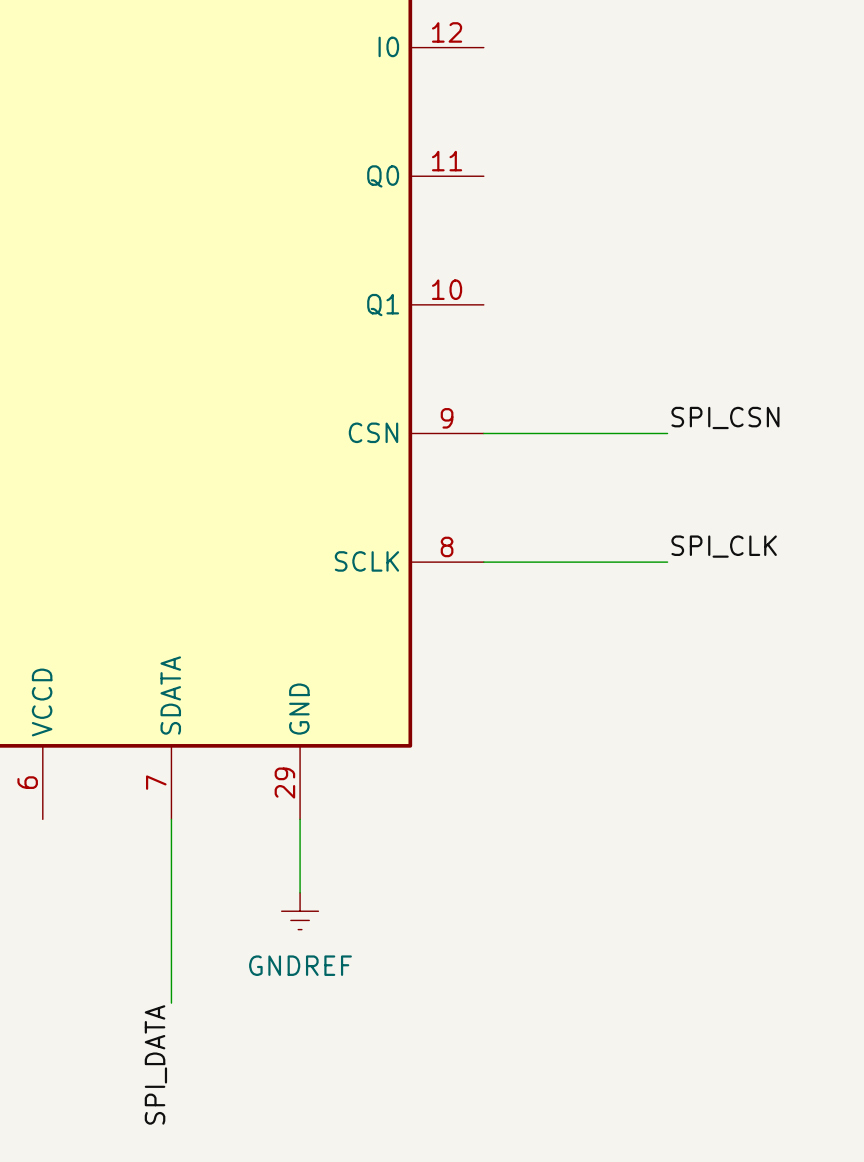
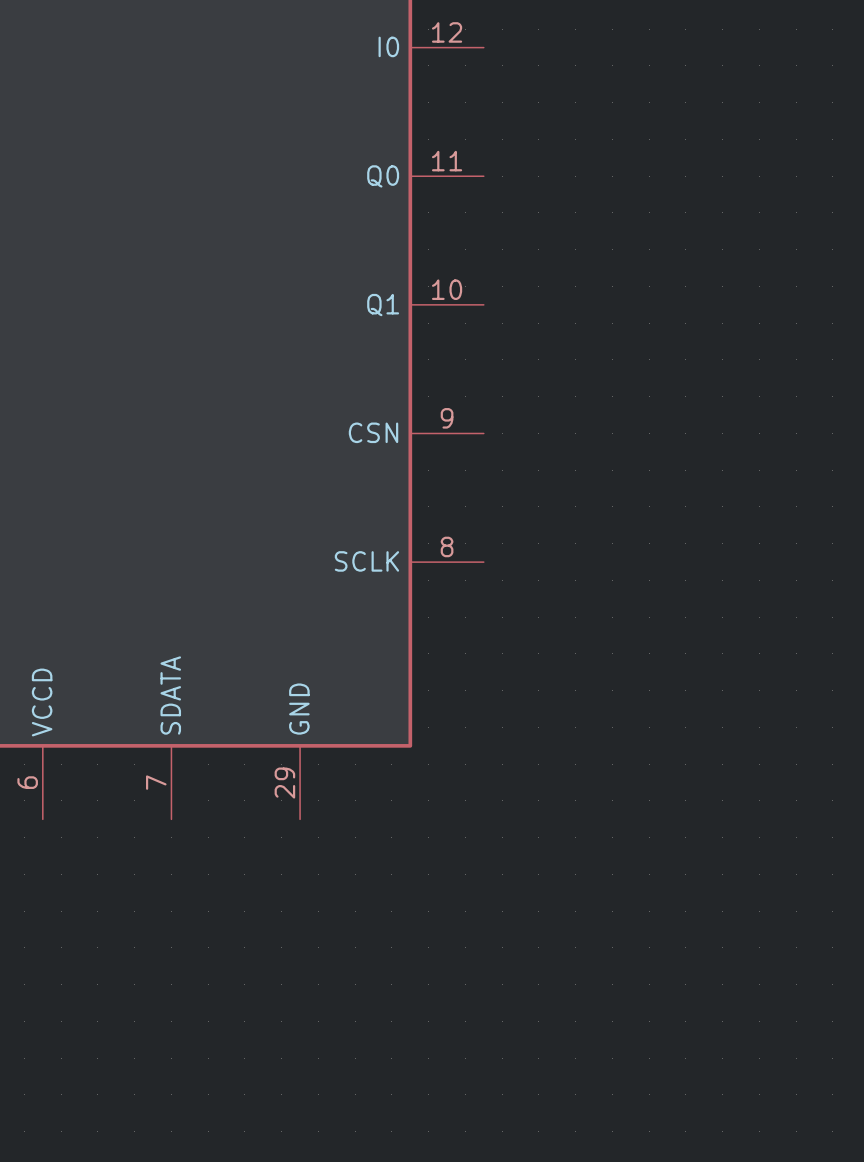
label: SPI_CSN (725, 417) -> none
wire: (483, 433) (667, 433) -> none
label: SPI_CLK (724, 546) -> none
wire: (483, 562) (667, 562) -> none
wire: (171, 819) (171, 1003) -> none
wire: (300, 819) (300, 892) -> none
power symbol: GNDREF (300, 911) -> none
label: SPI_DATA (155, 1064) -> none

